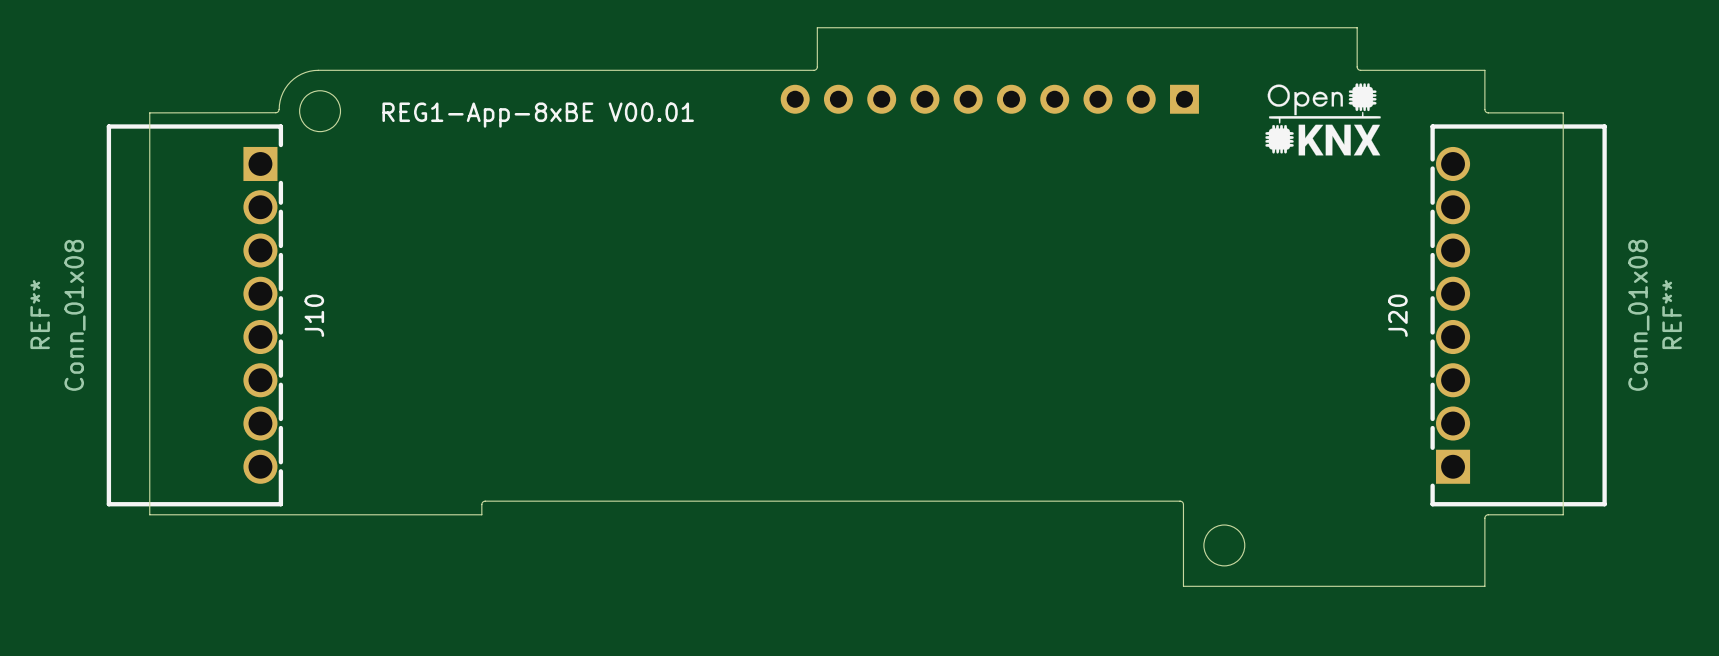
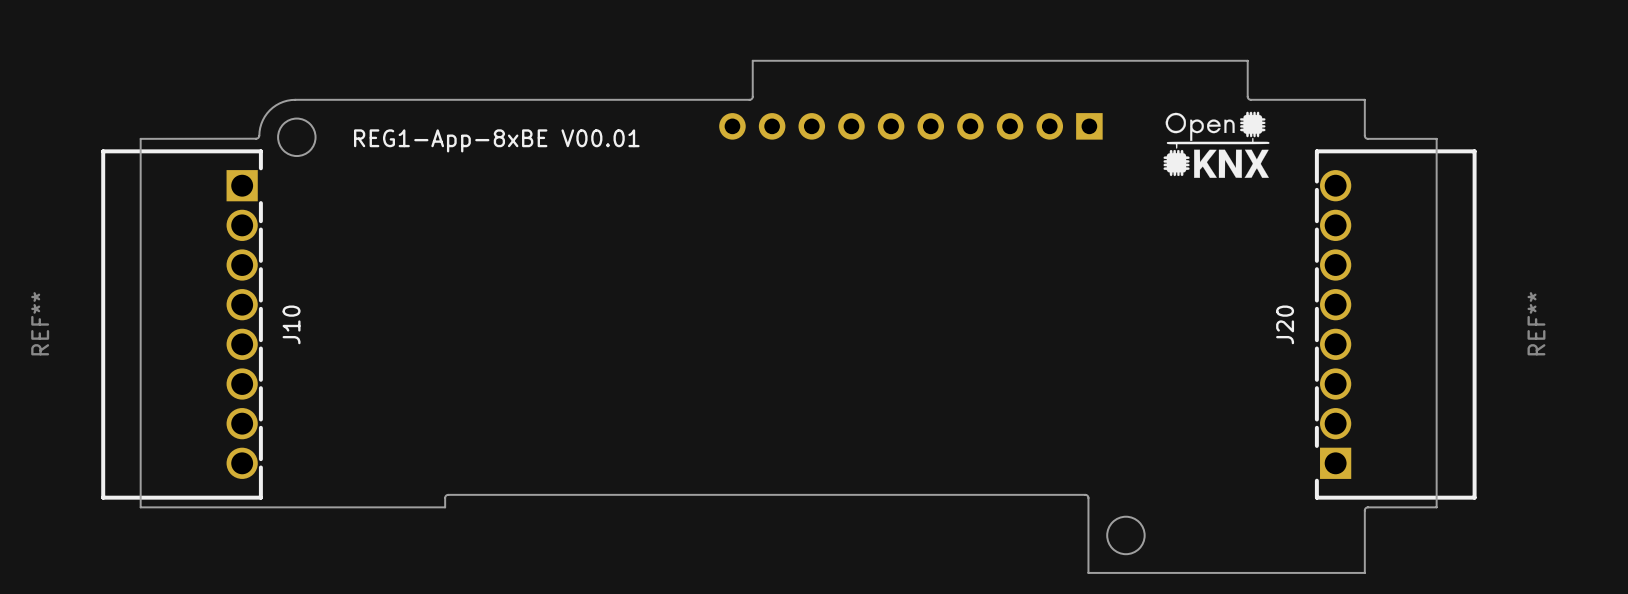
J10 value: Conn_01x08 (75, 315) -> none
J20 value: Conn_01x08 (1638, 315) -> none

